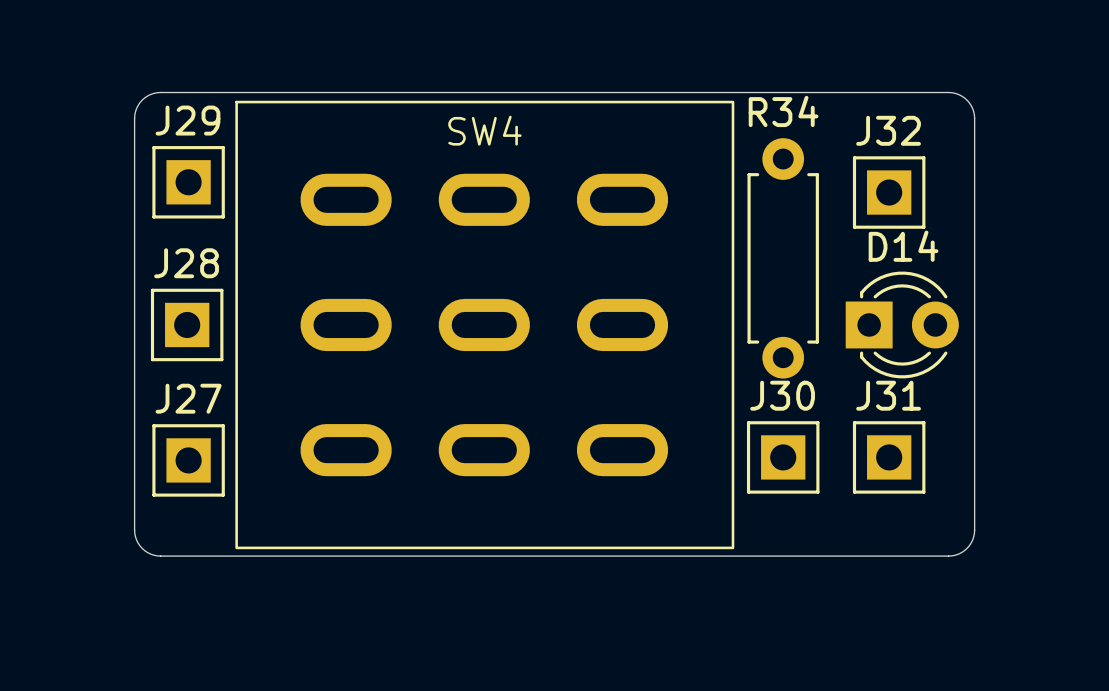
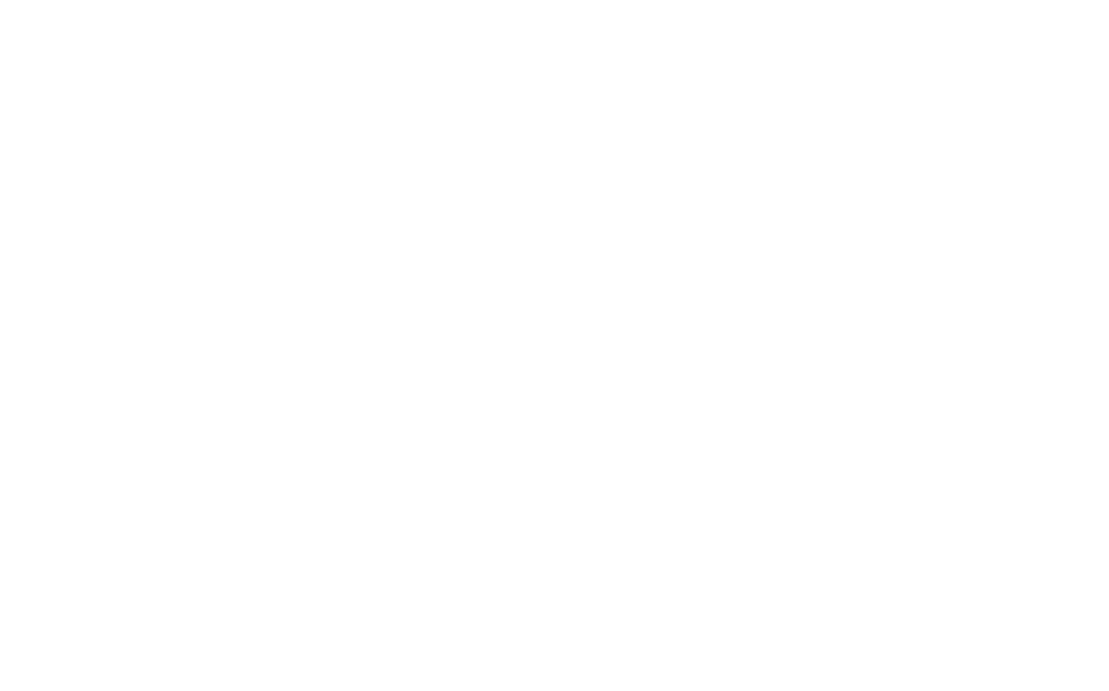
board edge: (160, 92) (948, 92) (962, 96) (970, 104) (974, 118) (974, 530) (970, 543) (959, 553) (948, 556) (160, 556) (147, 552) (138, 543) (134, 530) (134, 118) (137, 107) (142, 100) (149, 95) (160, 92) -> none
J29: (188, 182) -> none
J32: (889, 192) -> none
R34: (783, 258) -> none
J28: (187, 324) -> none
SW4: (484, 324) -> none
D14: (902, 324) -> none
J30: (783, 457) -> none
J31: (889, 457) -> none
J27: (188, 460) -> none

